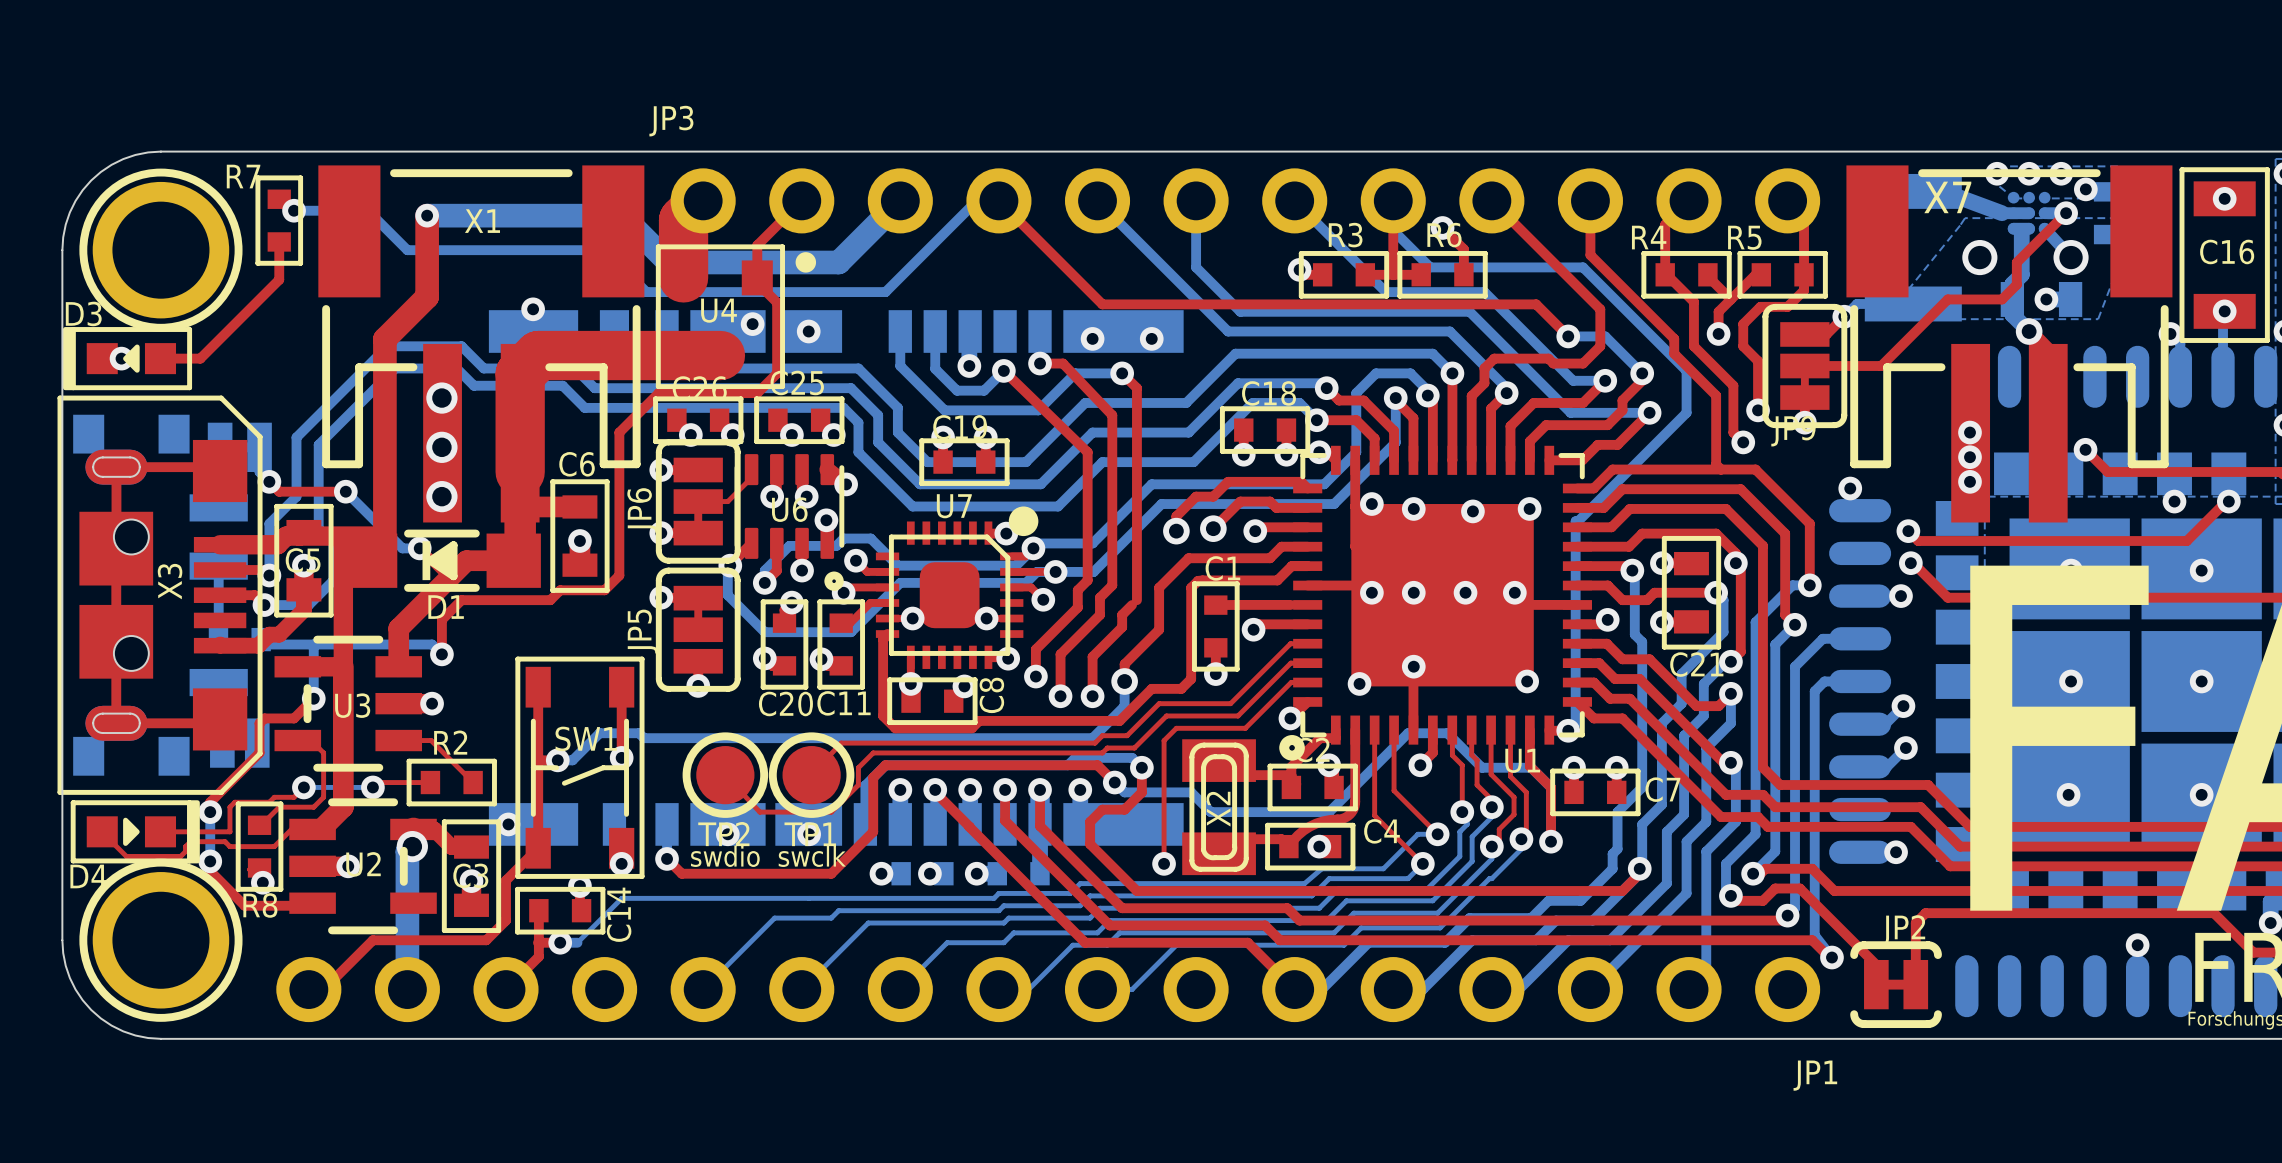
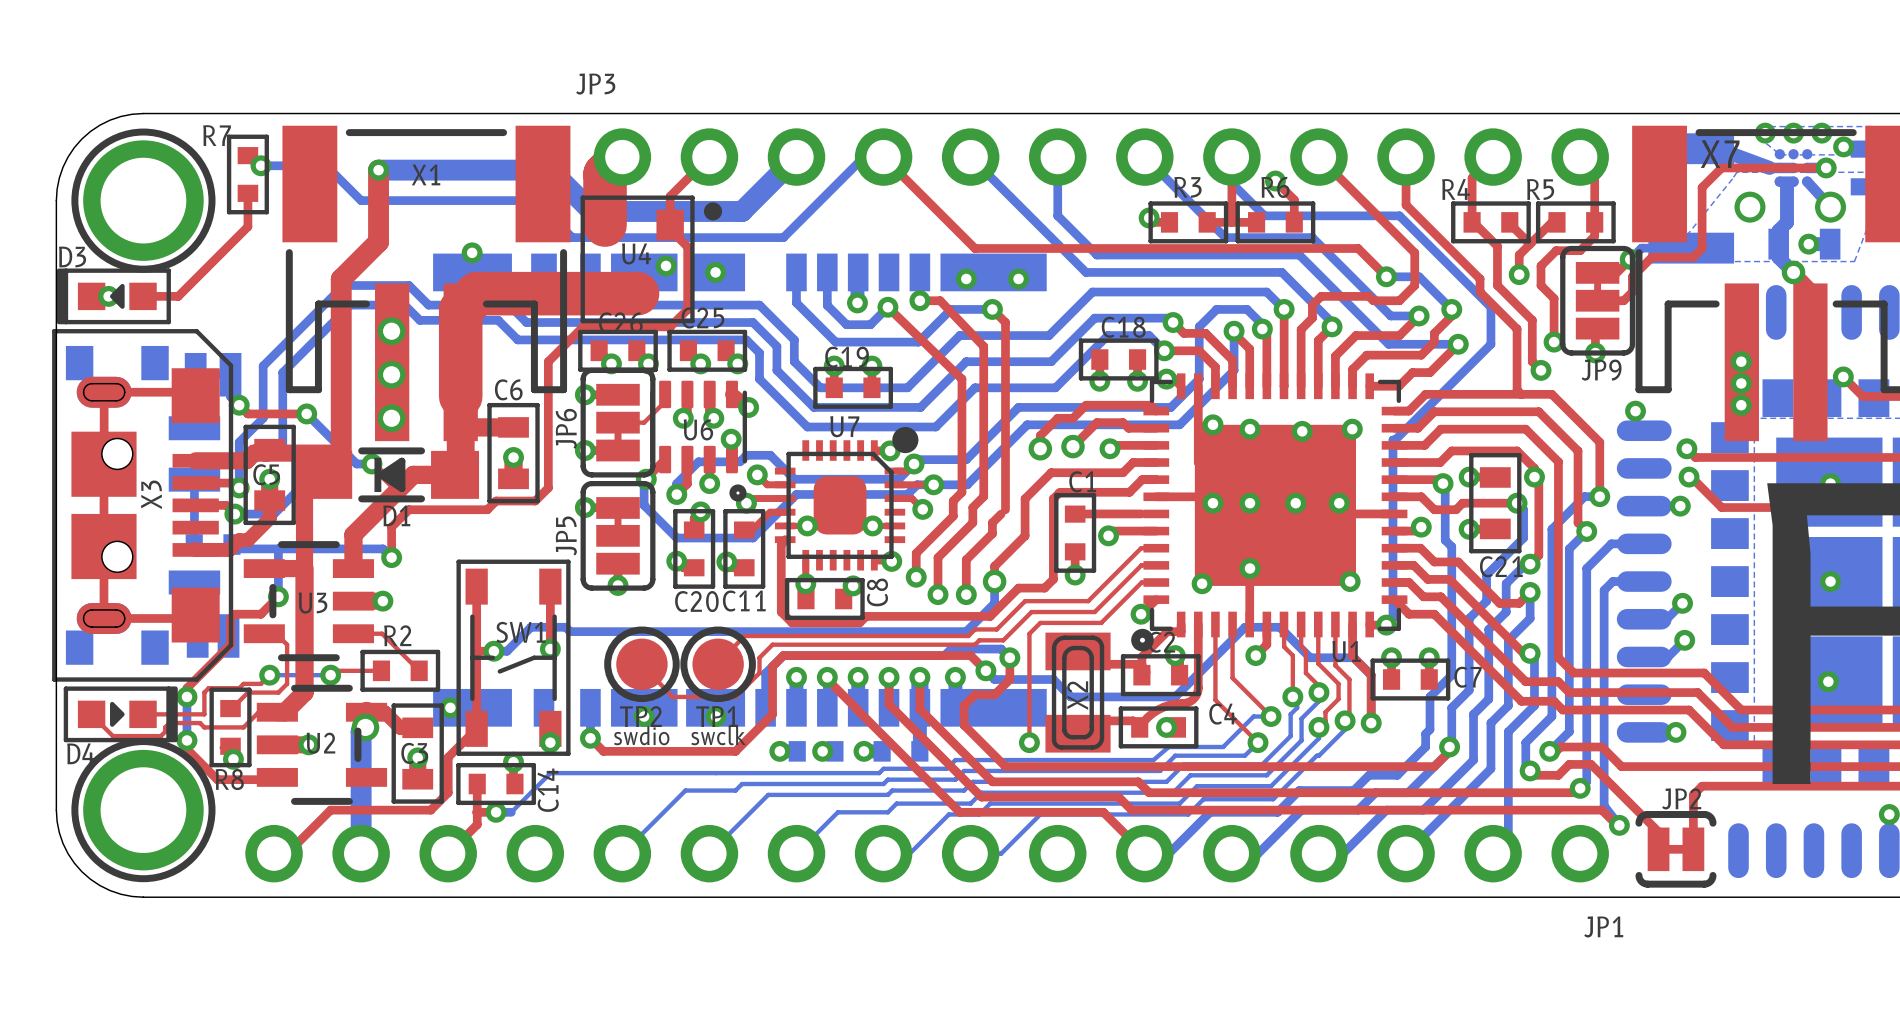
top track: (2066, 213) (2016, 262) (2016, 284) (2002, 299) (1947, 299) (1881, 366) (1804, 366) -> (1826, 167) (1721, 167) (1702, 187) (1702, 248) (1693, 257) (1652, 257) (1632, 276) (1632, 292) (1623, 300) (1597, 300)
JP9 rotation: 0° (1804, 366) -> 180° (1597, 300)

